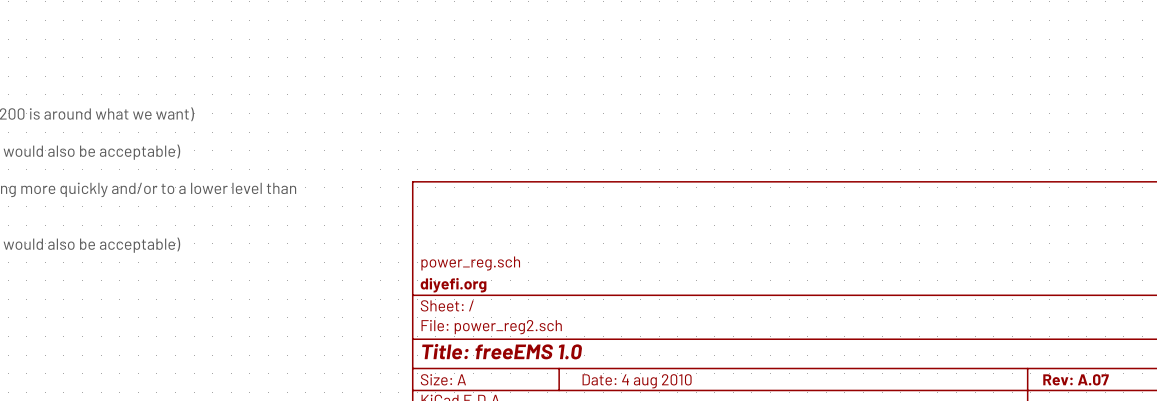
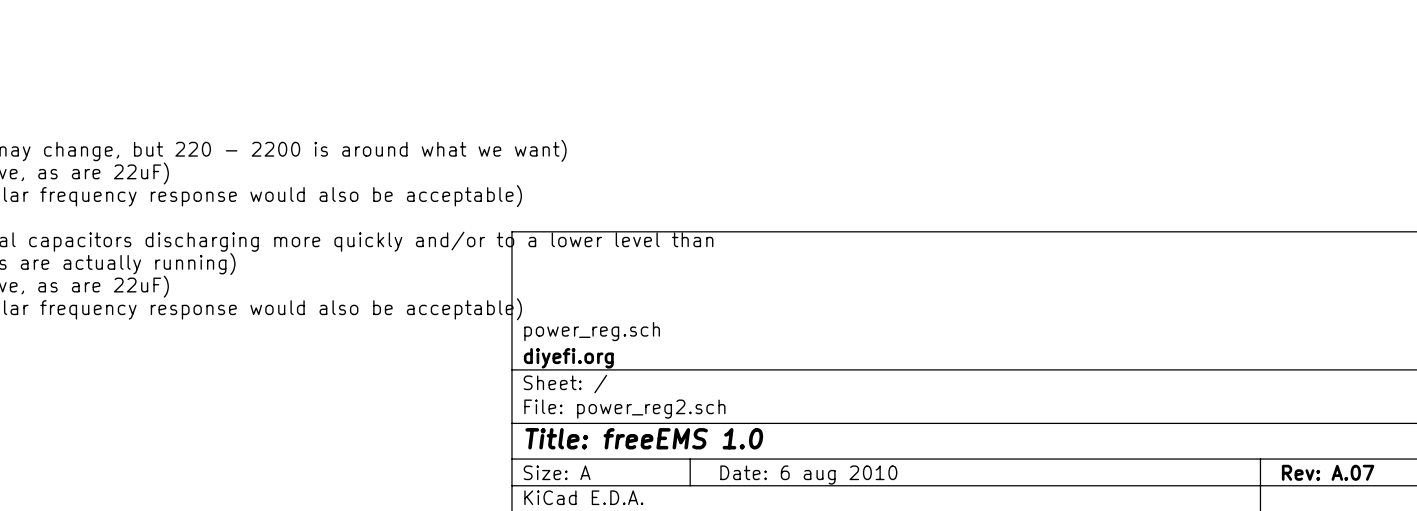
title block: Date: 4 aug 2010 (637, 381) -> Date: 6 aug 2010 (808, 475)

